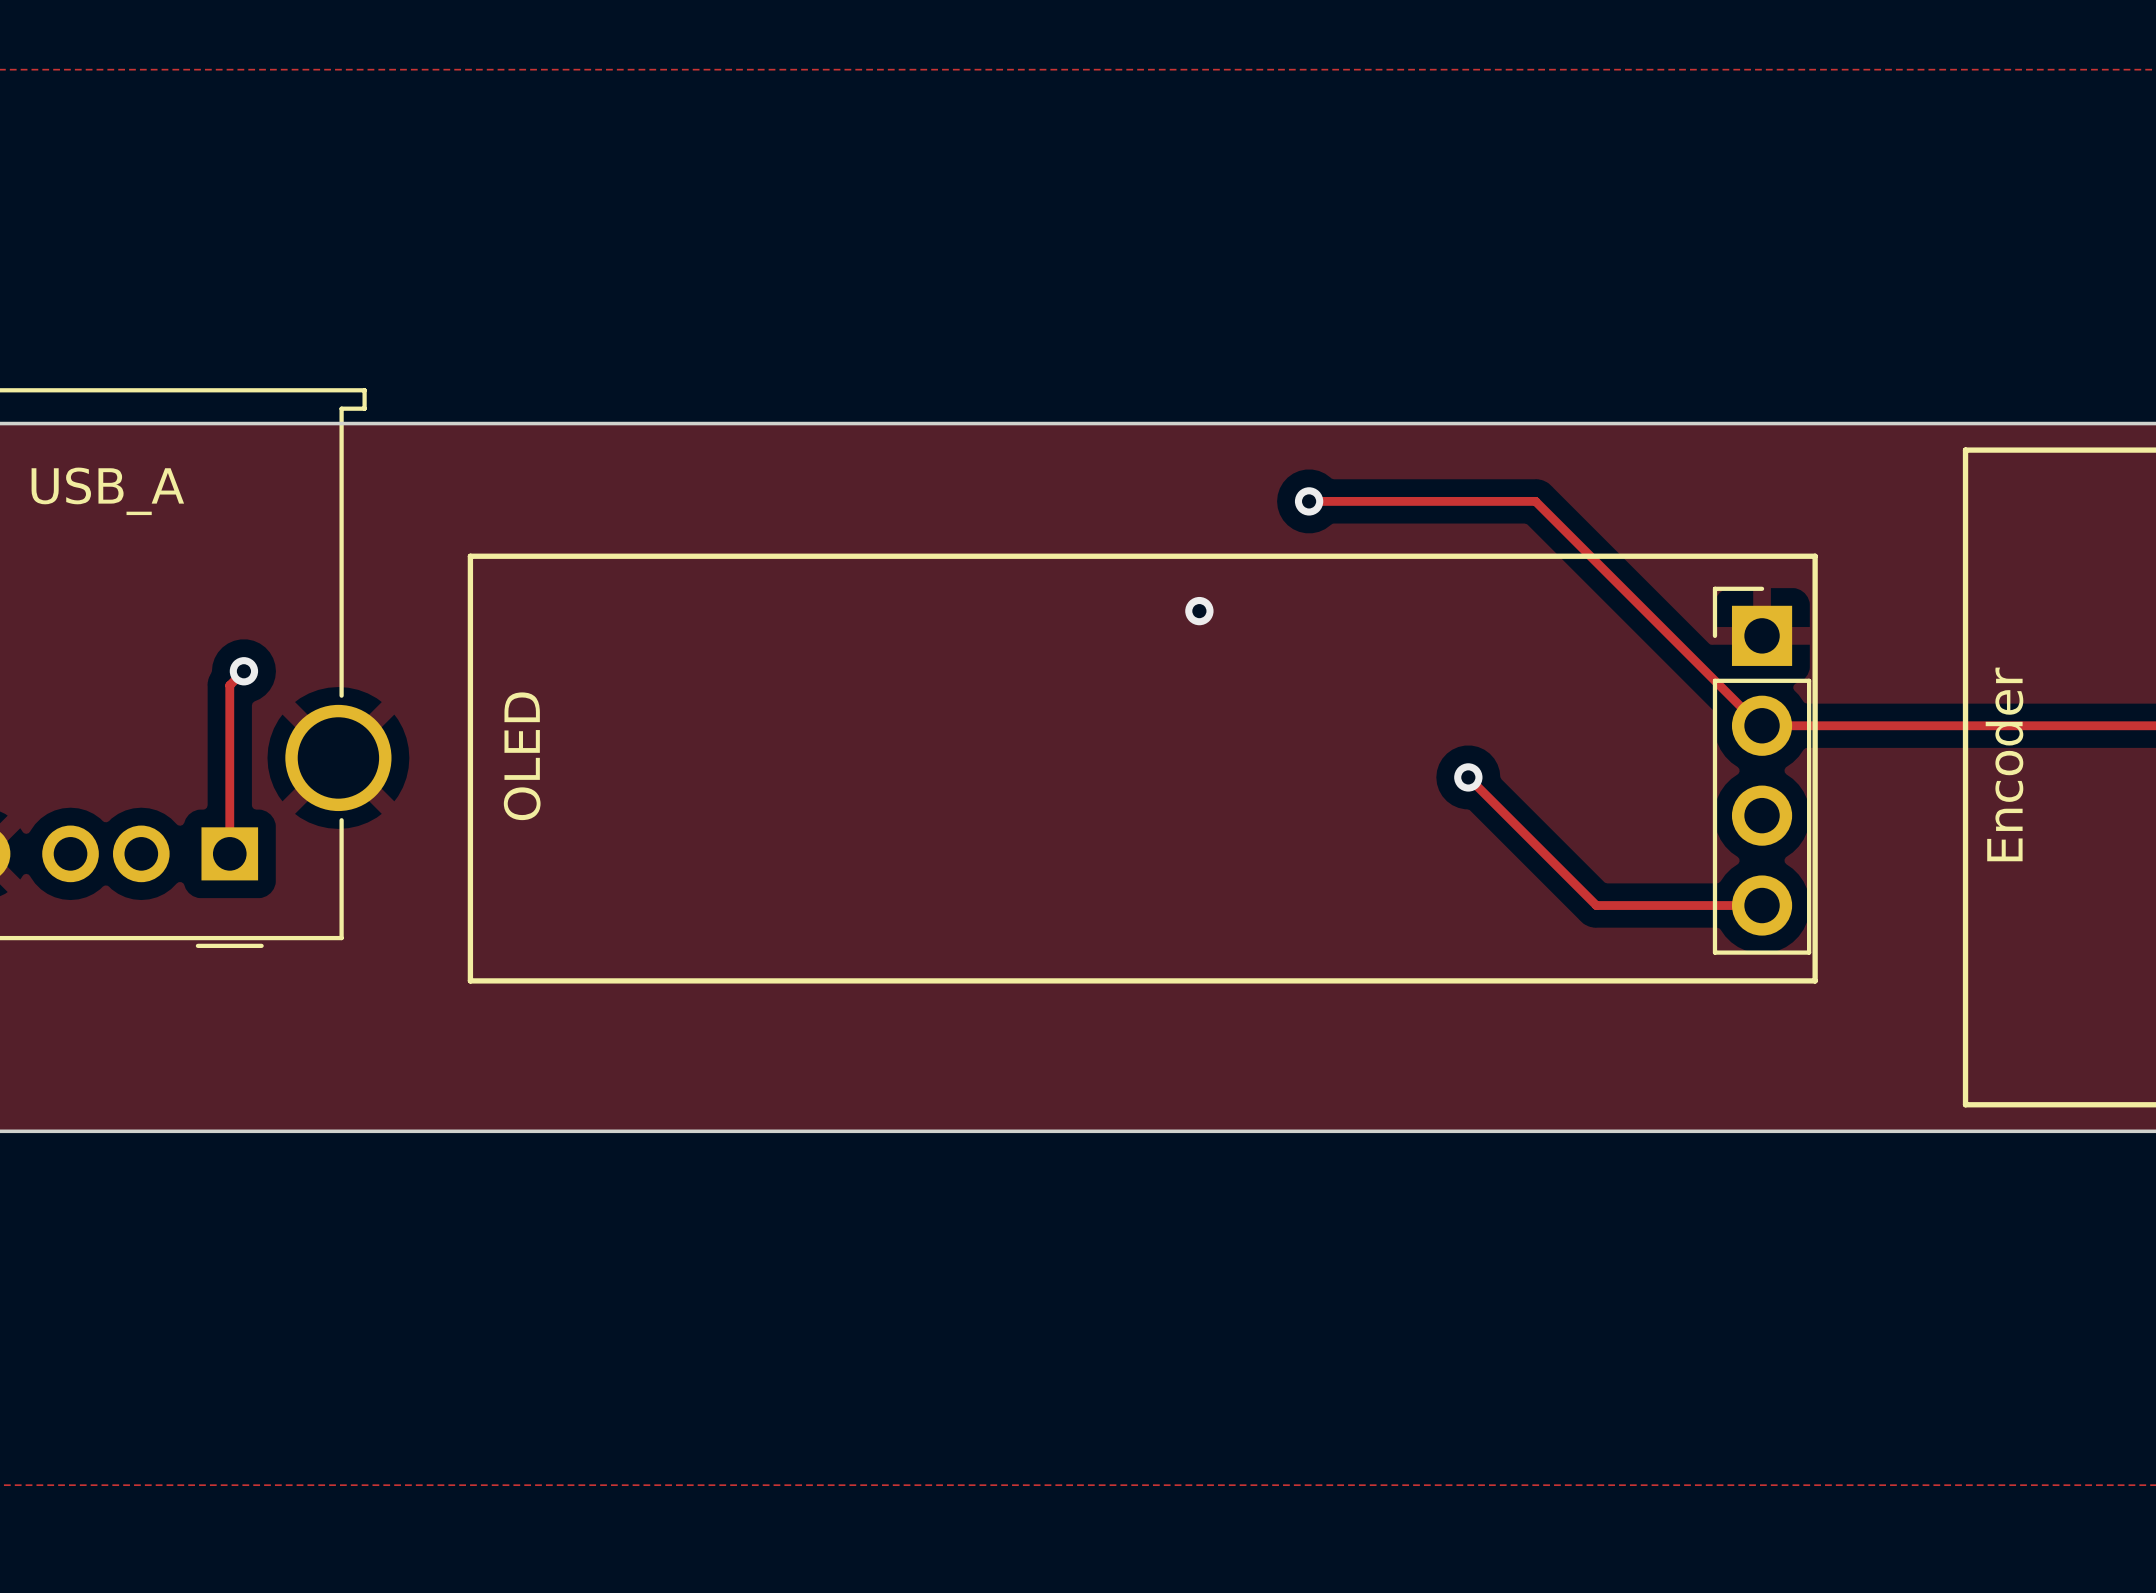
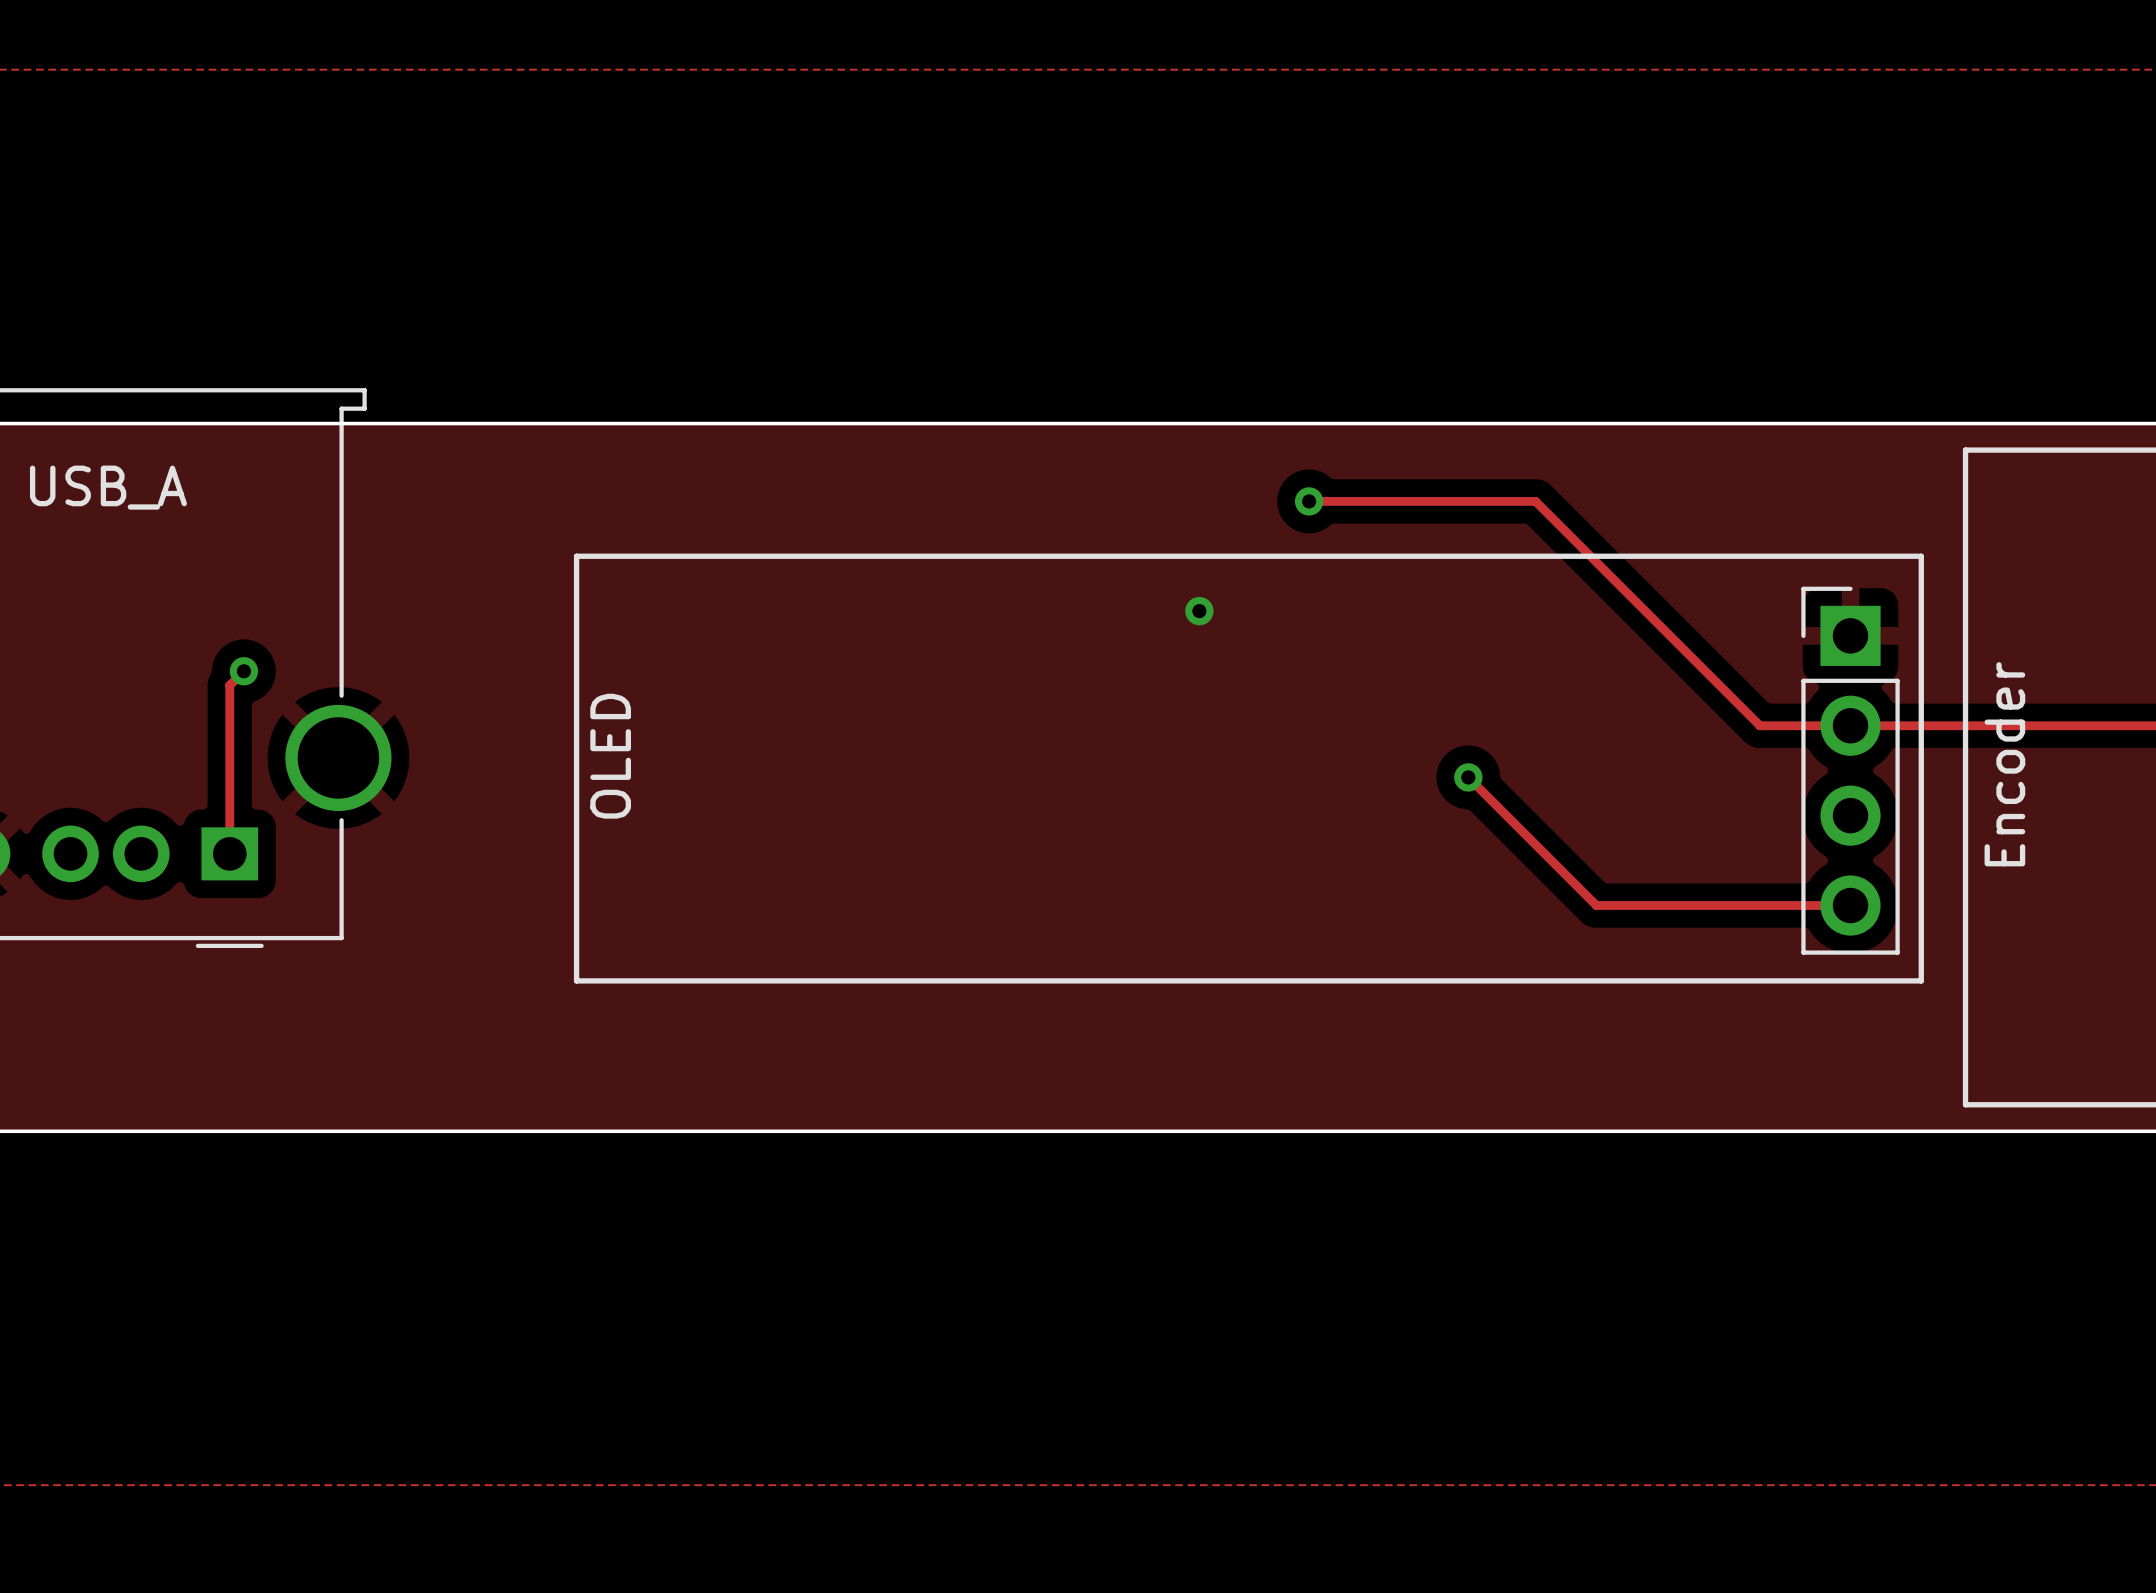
line: (576, 556) (470, 556) (470, 980) (576, 980) -> (576, 556) (576, 980)
line: (1815, 556) (1815, 980) -> (1815, 556) (1921, 556) (1921, 980) (1815, 980)
part position: (1762, 770) -> (1850, 770)
track: none -> (1762, 905) (1850, 905)

